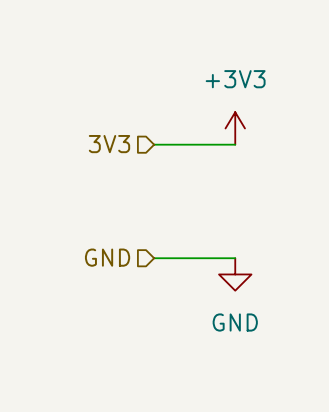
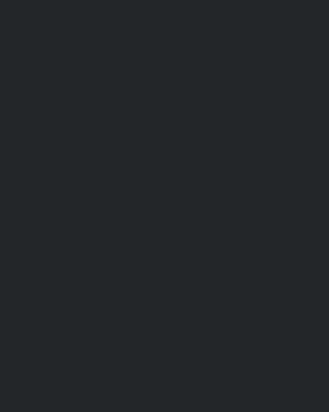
power symbol: +3V3 (235, 128) -> none
hierarchical label: 3V3 (109, 144) -> none
wire: (154, 144) (235, 144) -> none
hierarchical label: GND (107, 257) -> none
wire: (154, 258) (235, 258) -> none
power symbol: GND (235, 274) -> none

